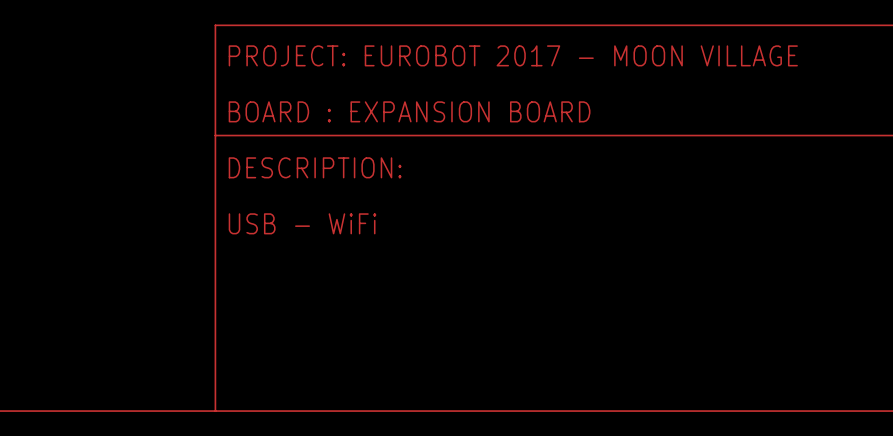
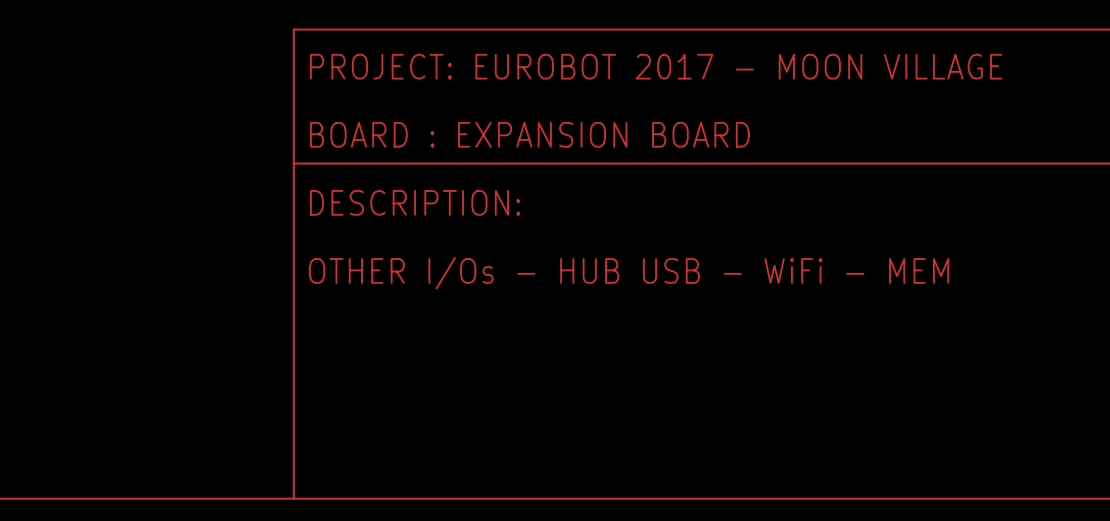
text: USB - WiFi (302, 223) -> OTHER I/Os - HUB USB - WiFi - MEM (629, 273)

